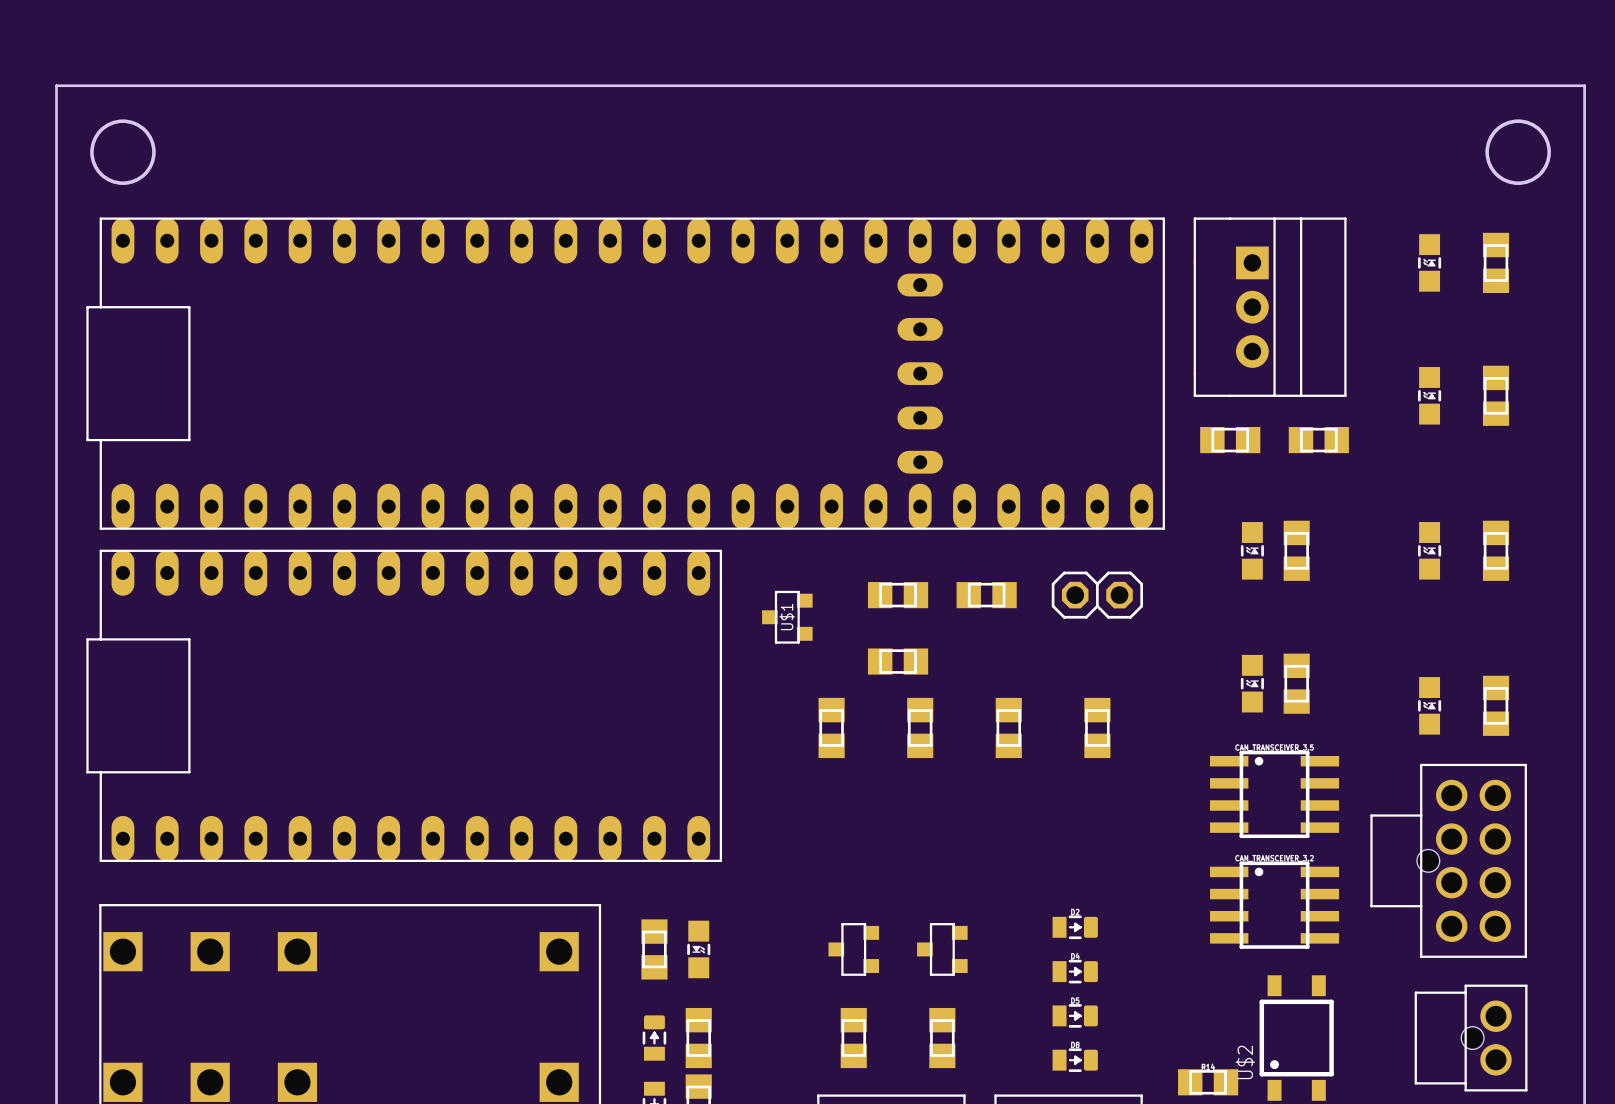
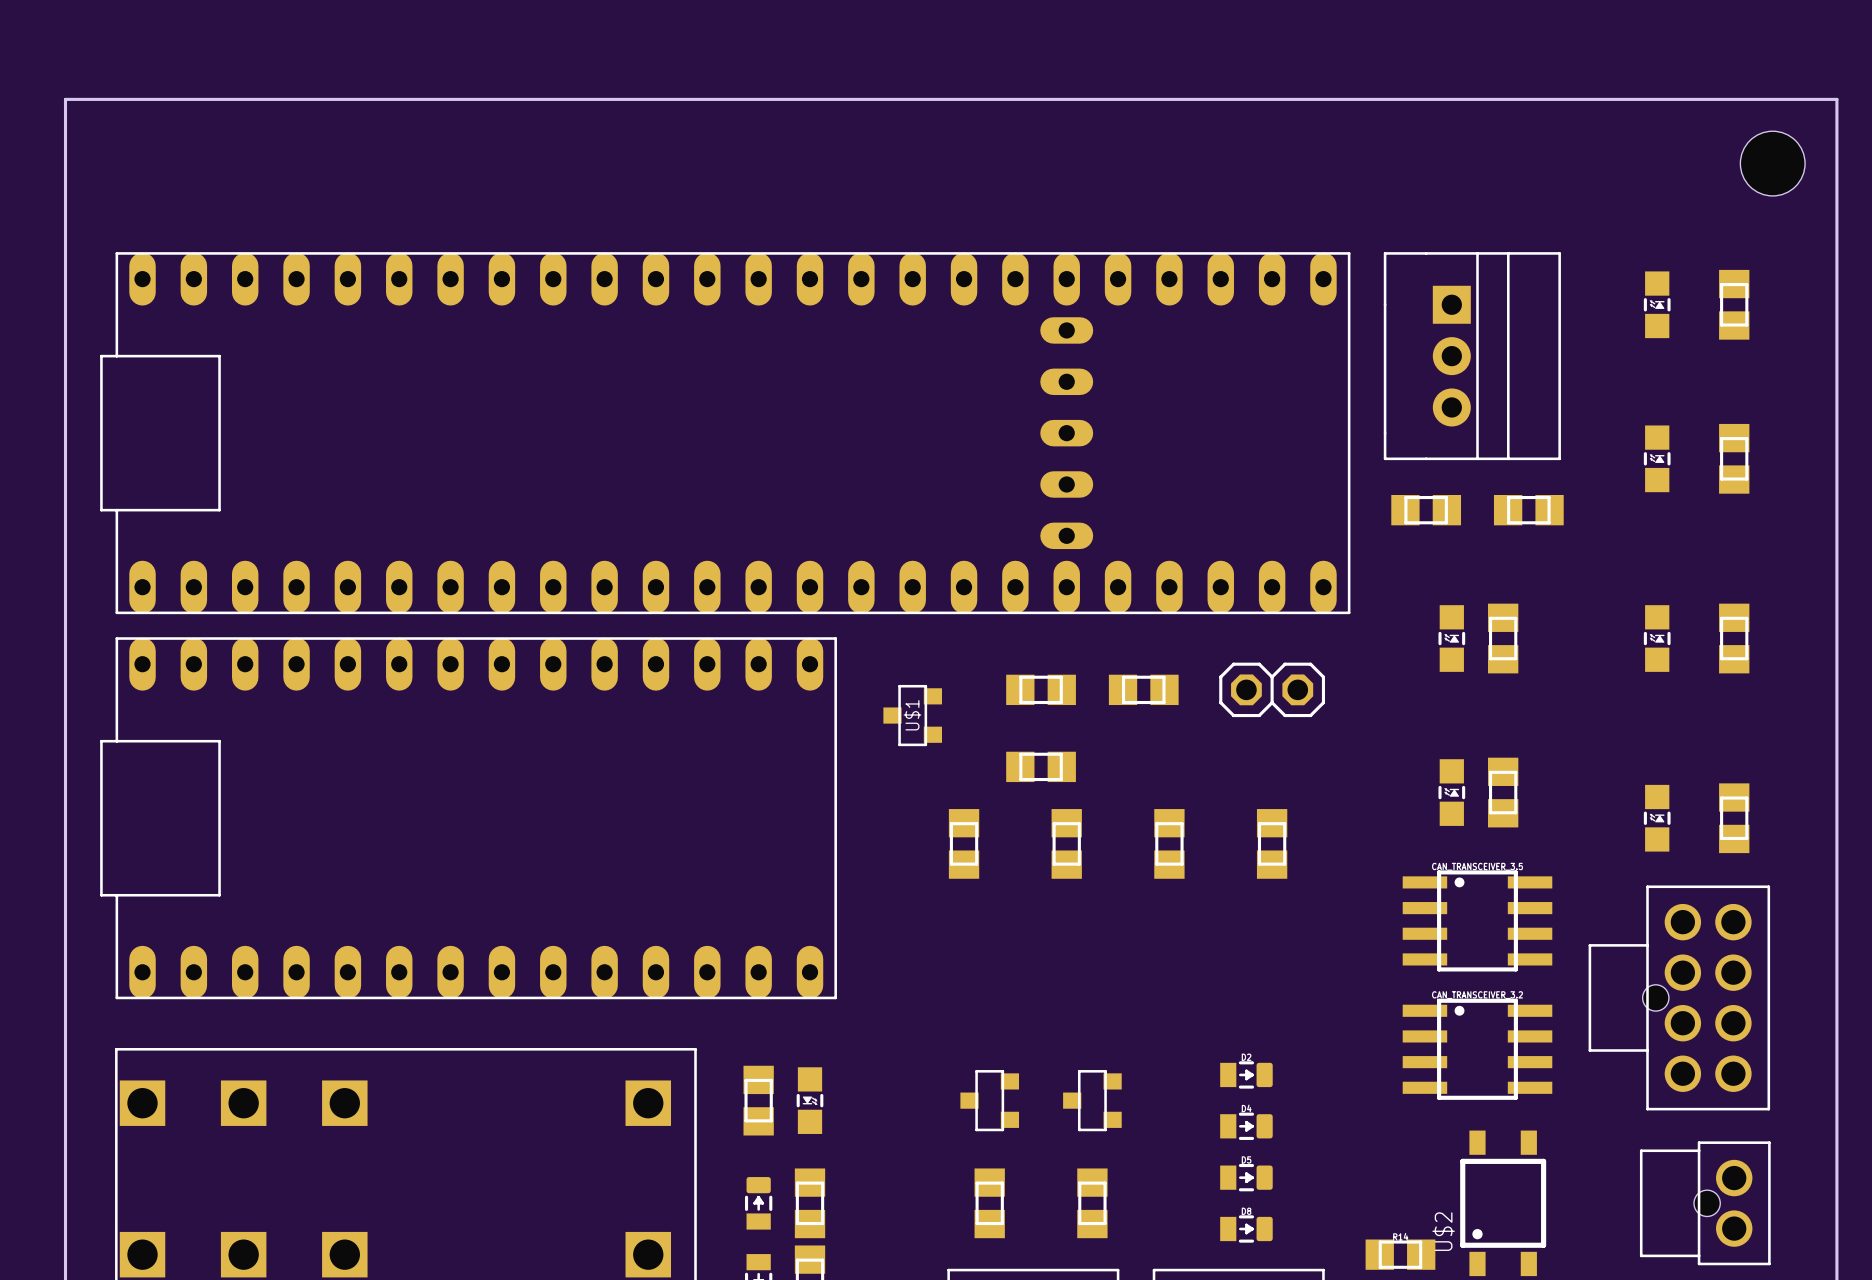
round board edge: [90, 119, 156, 185] -> none
round board edge: [1485, 119, 1551, 185] -> none
hole: none -> (1772, 163)

